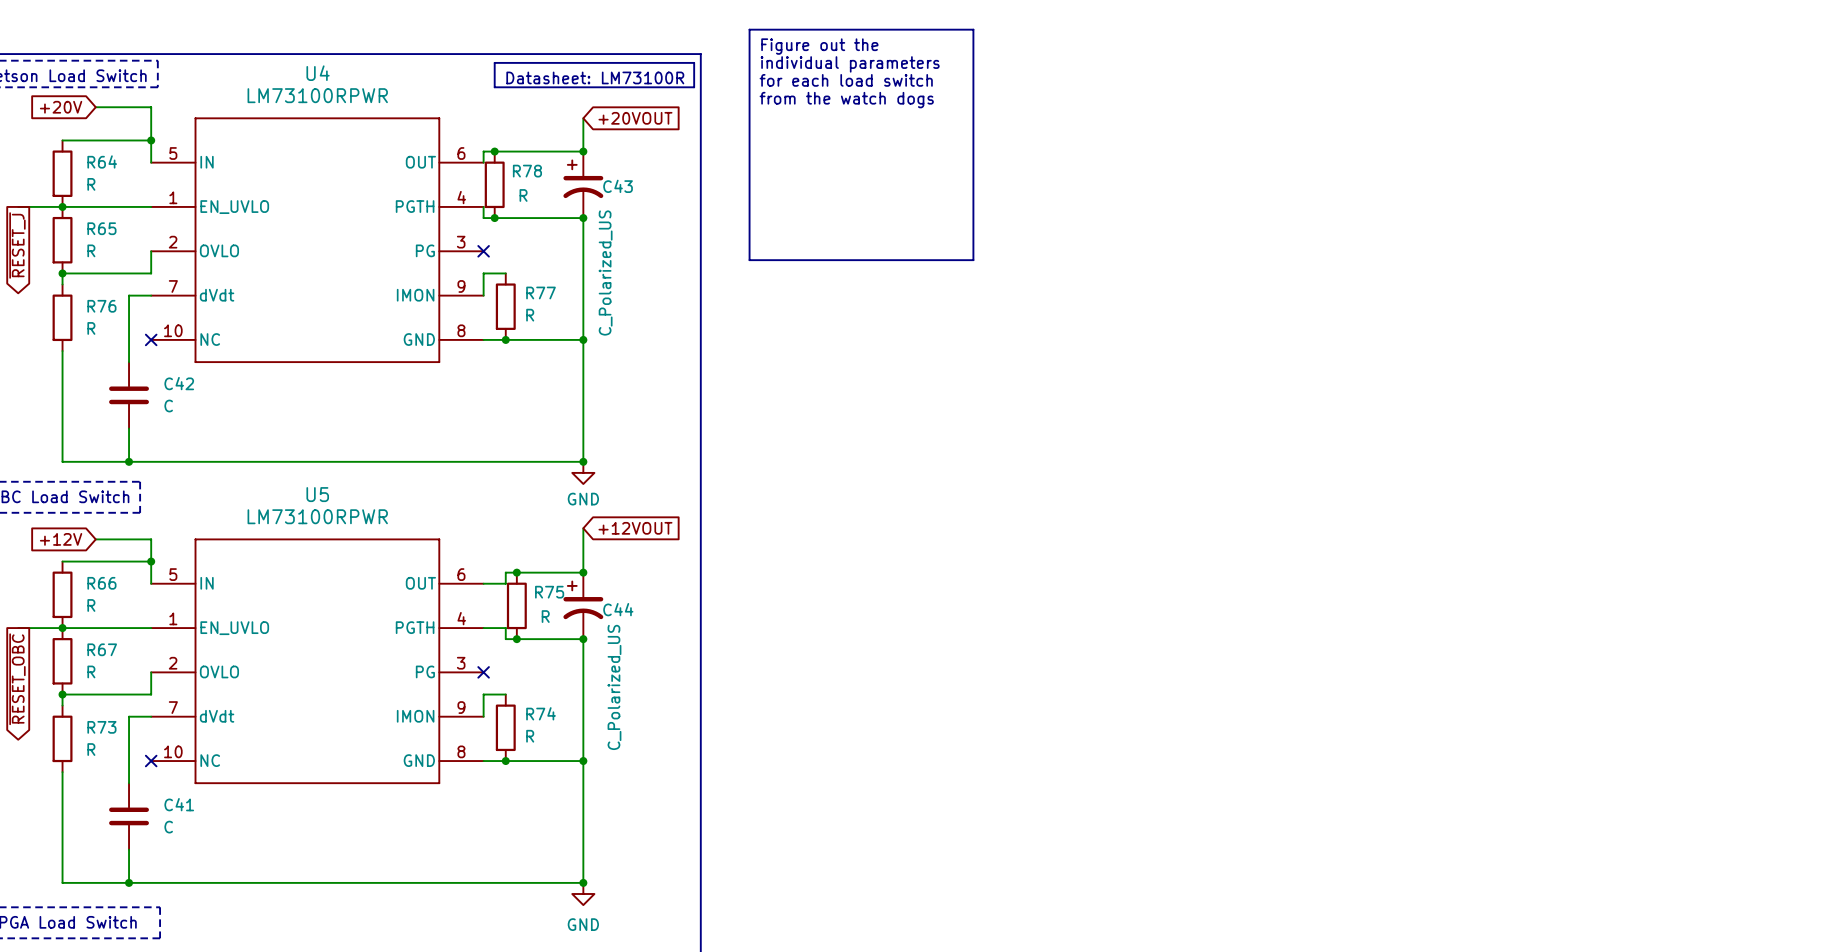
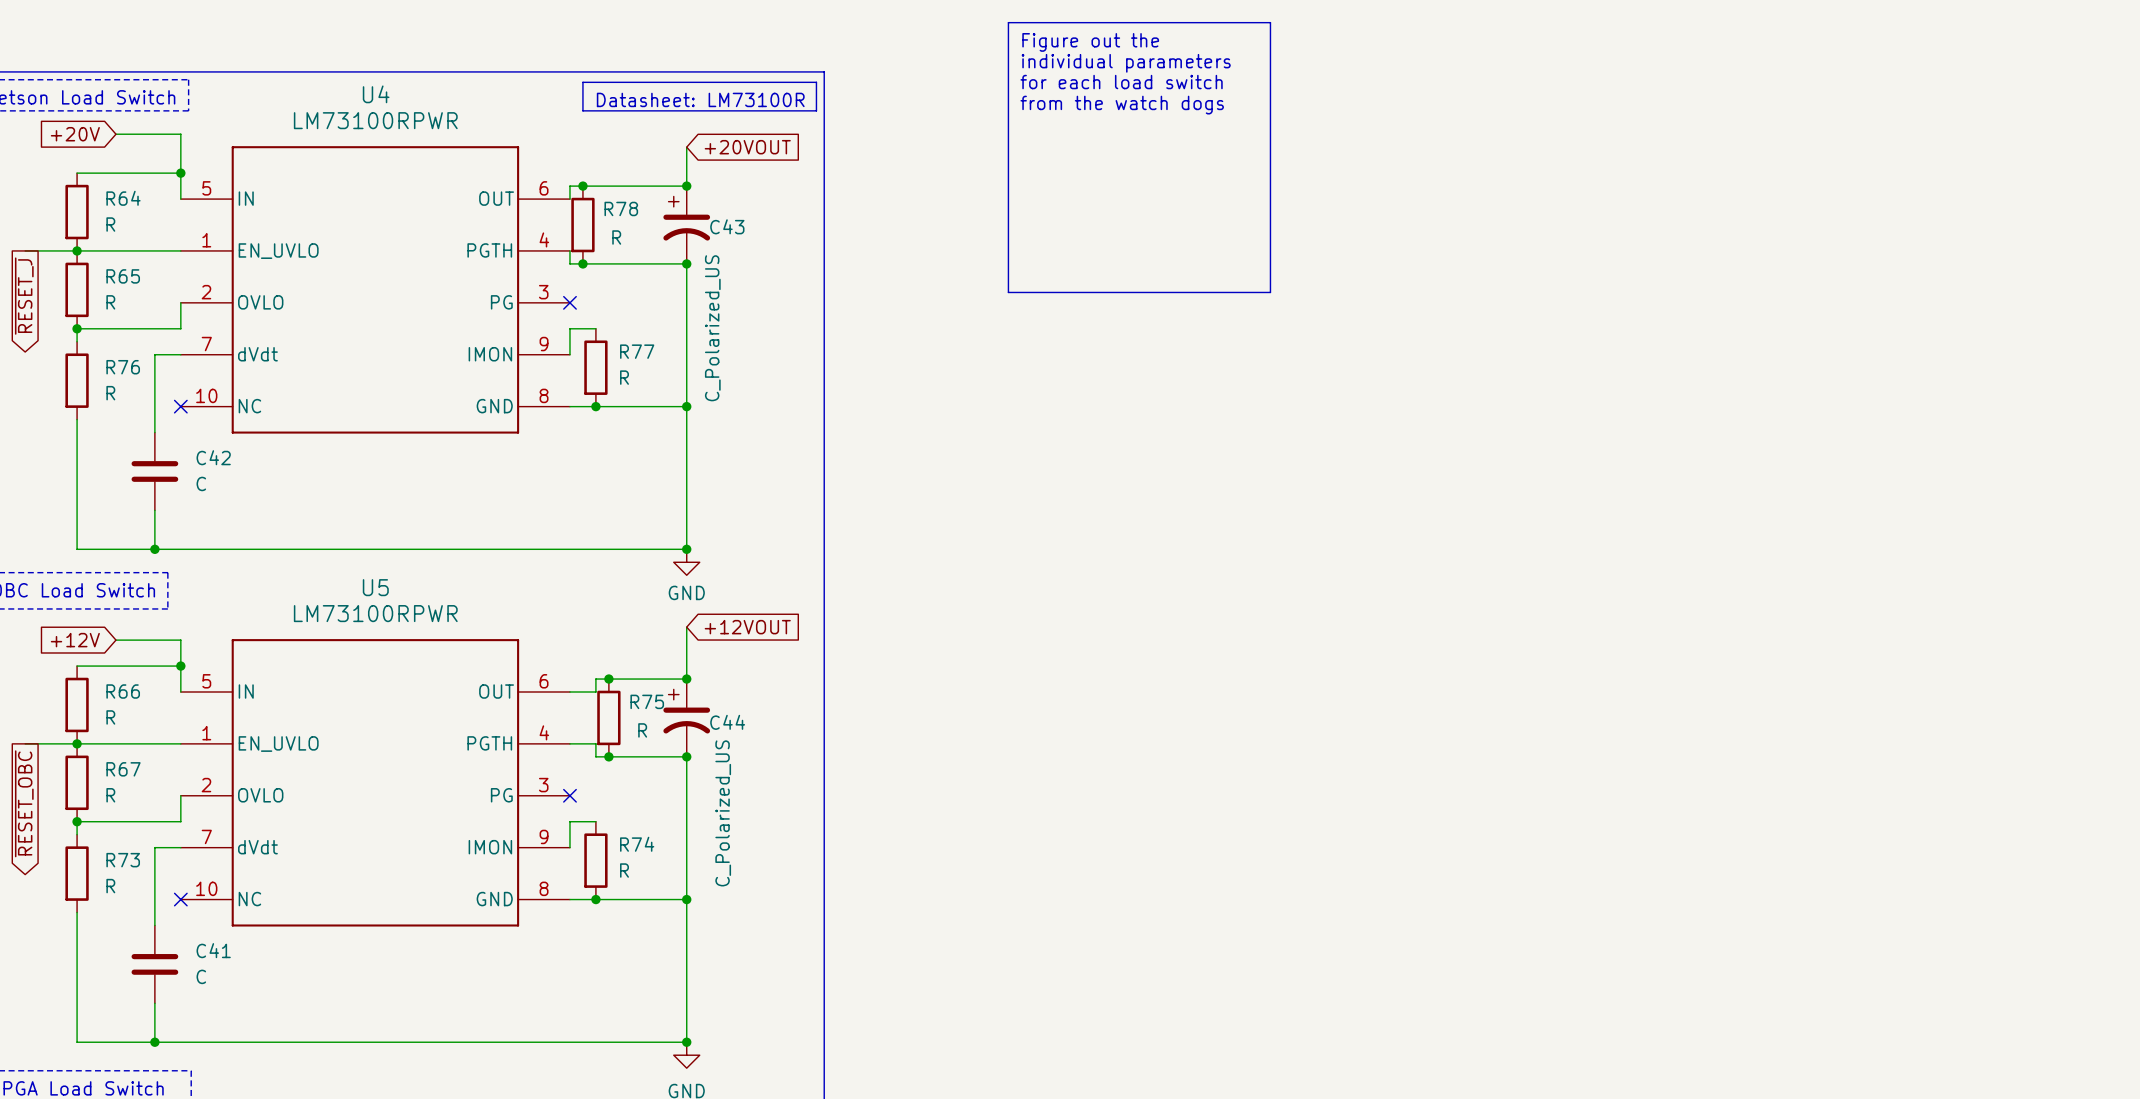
line: (749, 29) (973, 29) (973, 260) (749, 260) (749, 29) -> (1008, 22) (1270, 22) (1270, 292) (1008, 292) (1008, 22)
text position: Figure out the (819, 46) -> Figure out the (1090, 42)
text position: individual parameters (850, 64) -> individual parameters (1126, 63)
text position: for each load switch (846, 80) -> for each load switch (1121, 82)
text position: from the watch dogs (846, 100) -> from the watch dogs (1122, 105)

